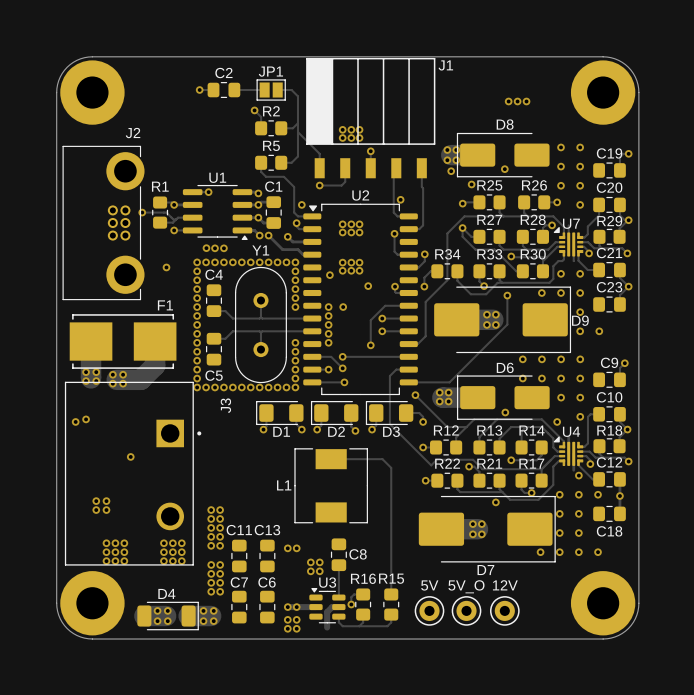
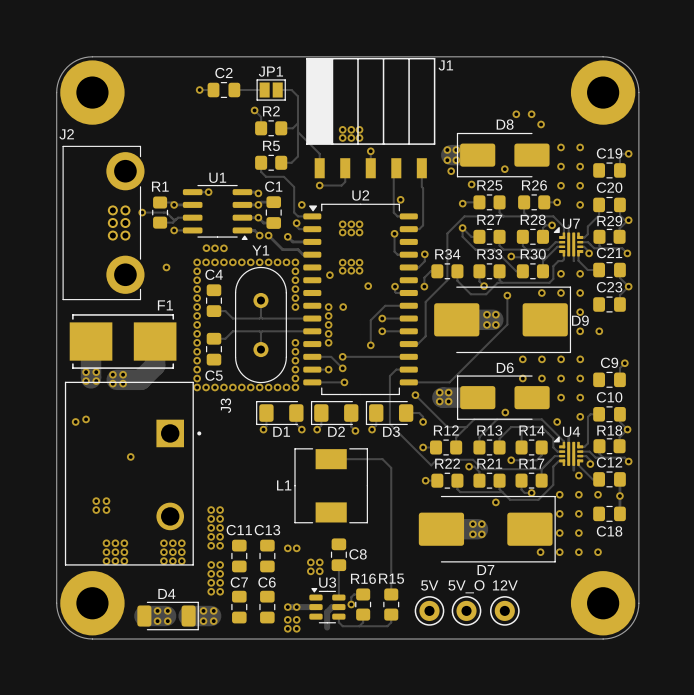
via: (508, 101) -> none
via: (517, 101) -> none
via: (526, 101) -> none
via: none -> (516, 114)
via: none -> (531, 114)
via: none -> (541, 124)
J2 name position: J2 (133, 133) -> J2 (66, 134)

